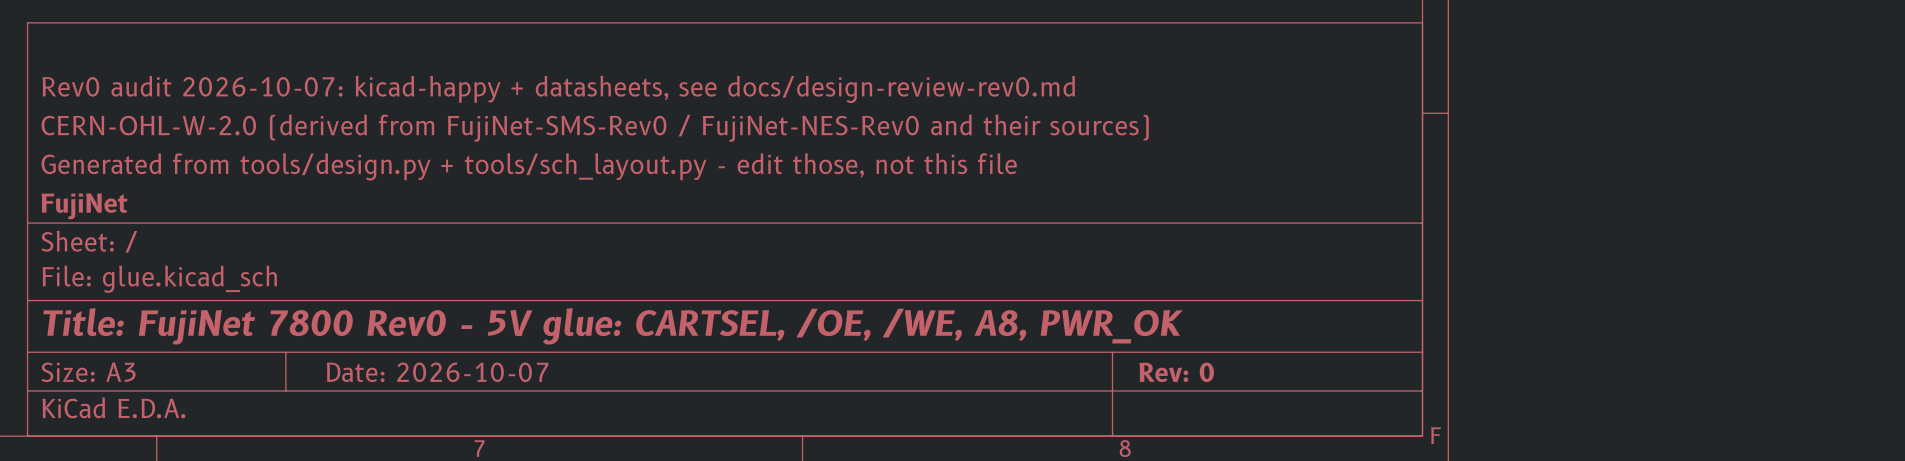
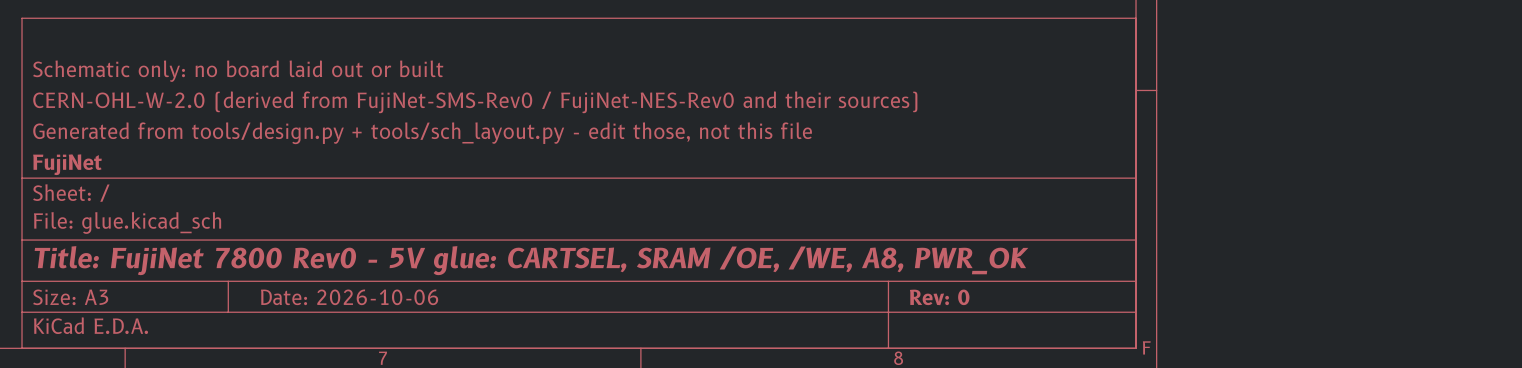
title block: Rev0 audit 2026-10-07: kicad-happy + datasheets, see docs/design-review-rev0.md (558, 89) -> Schematic only: no board laid out or built (238, 71)
title block: Title: FujiNet 7800 Rev0 - 5V glue: CARTSEL, /OE, /WE, A8, PWR_OK (613, 326) -> Title: FujiNet 7800 Rev0 - 5V glue: CARTSEL, SRAM /OE, /WE, A8, PWR_OK (531, 260)
title block: Date: 2026-10-07 (437, 372) -> Date: 2026-10-06 (349, 297)

